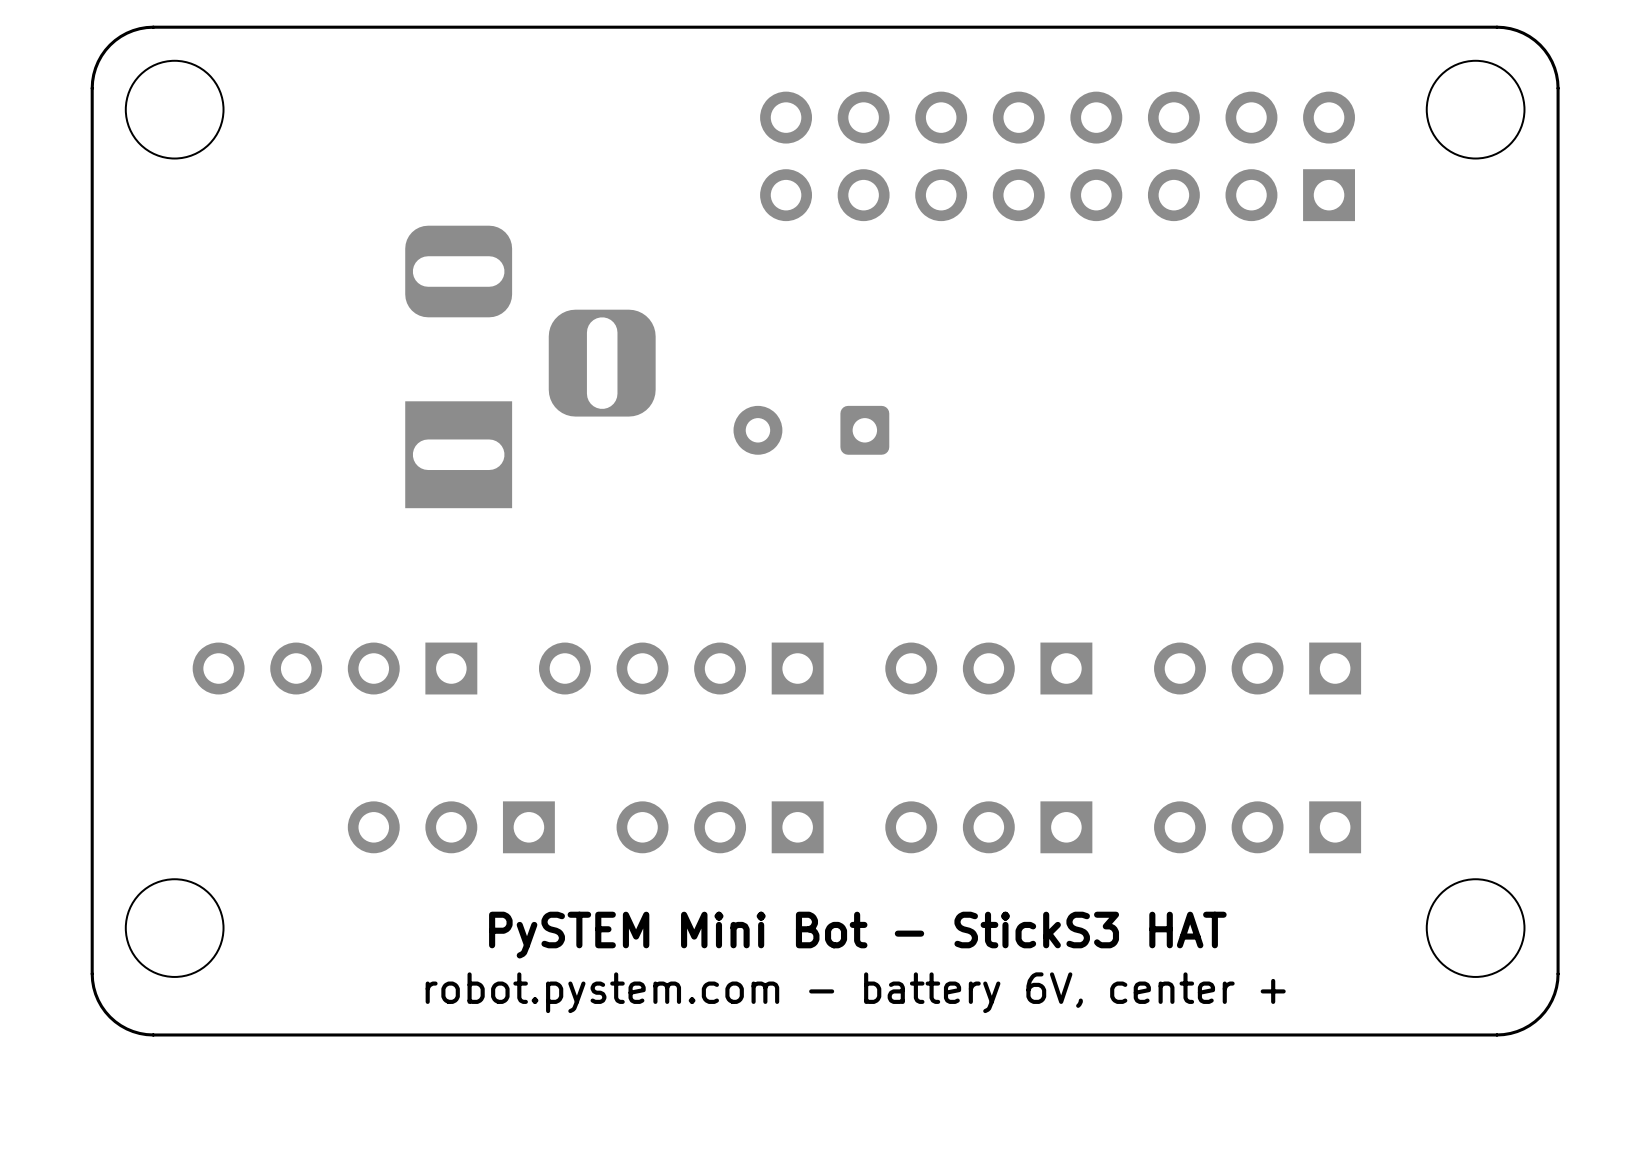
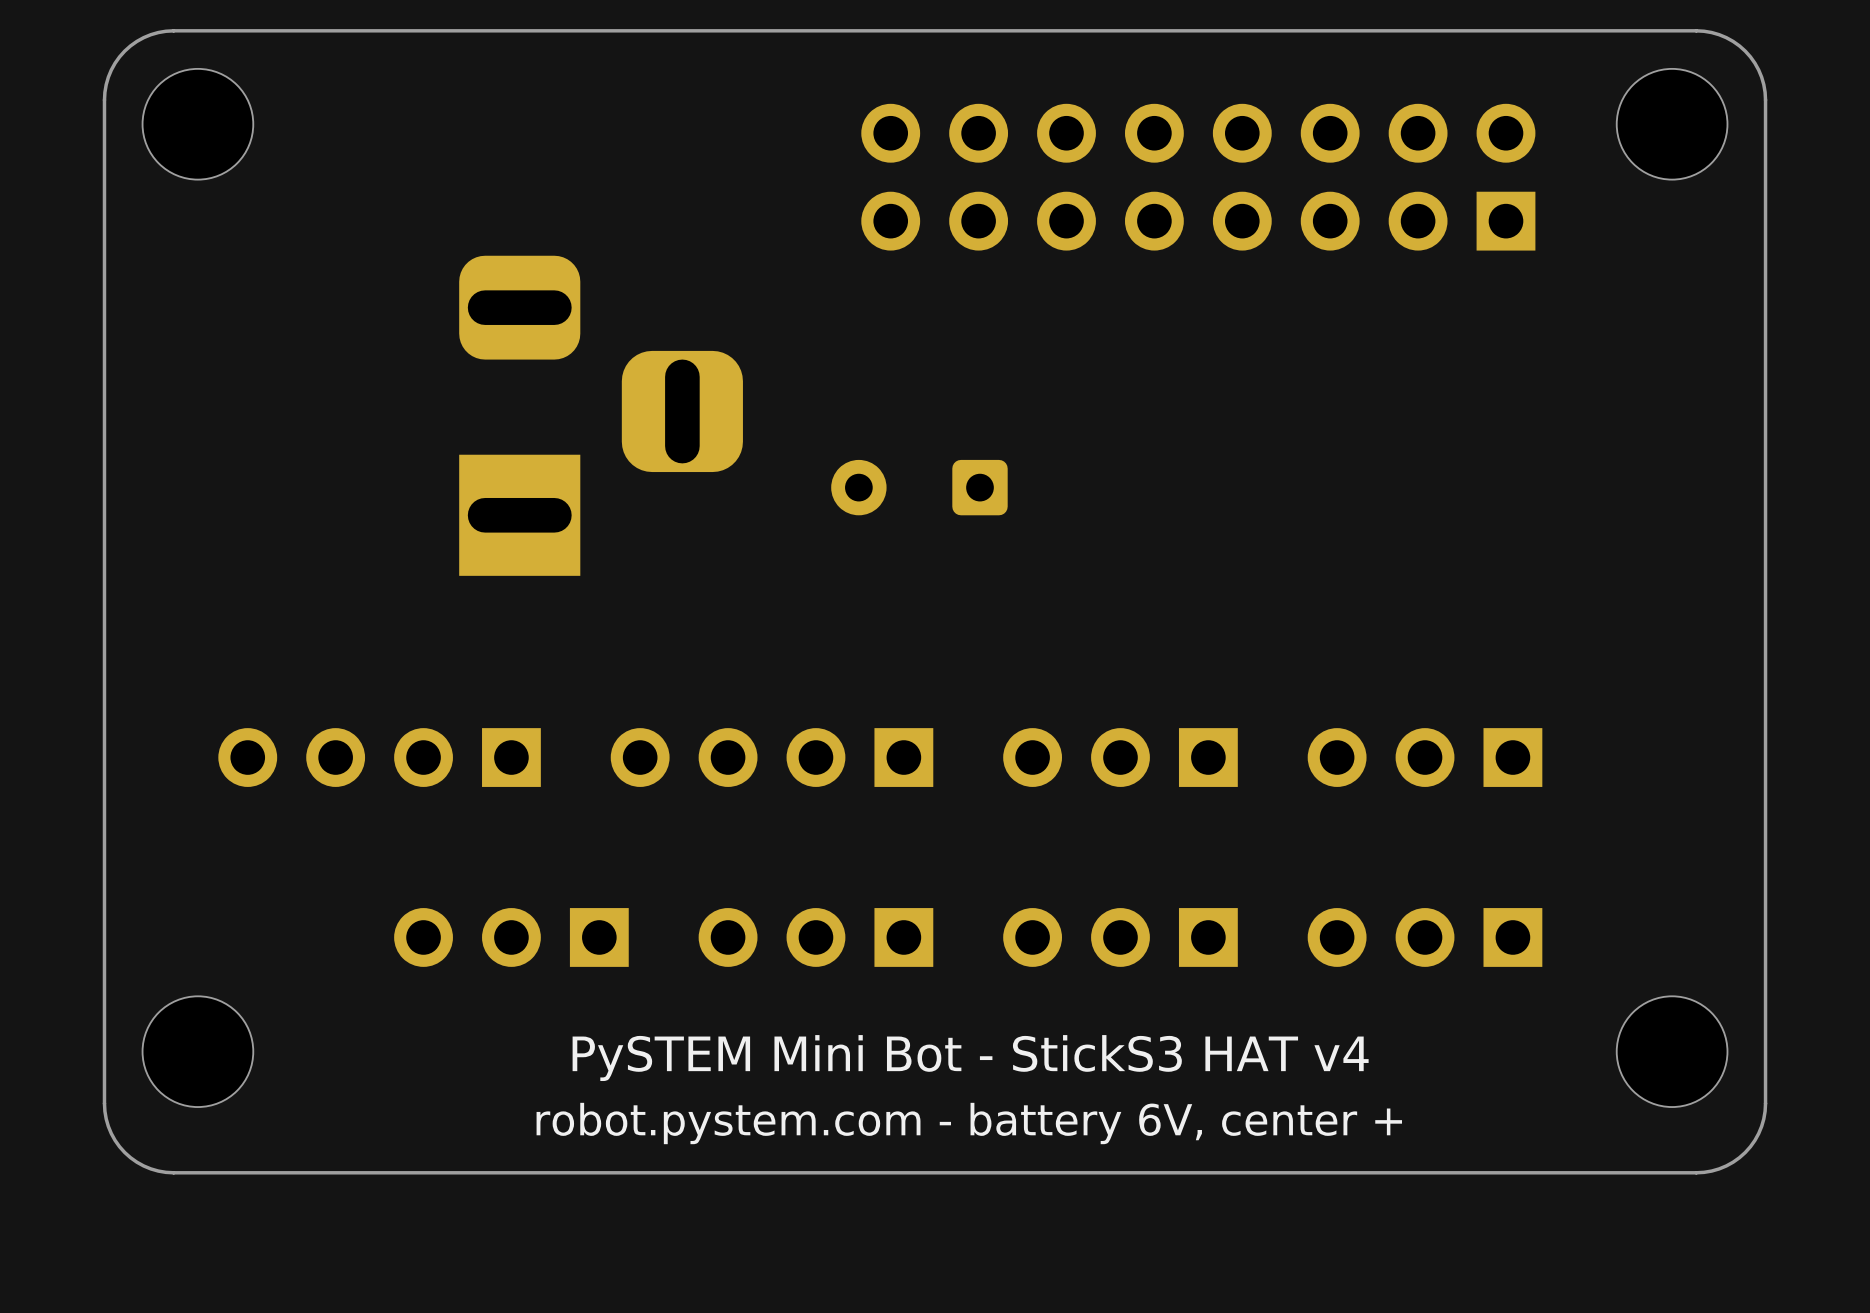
text: PySTEM Mini Bot - StickS3 HAT (857, 935) -> PySTEM Mini Bot - StickS3 HAT v4 (970, 1058)

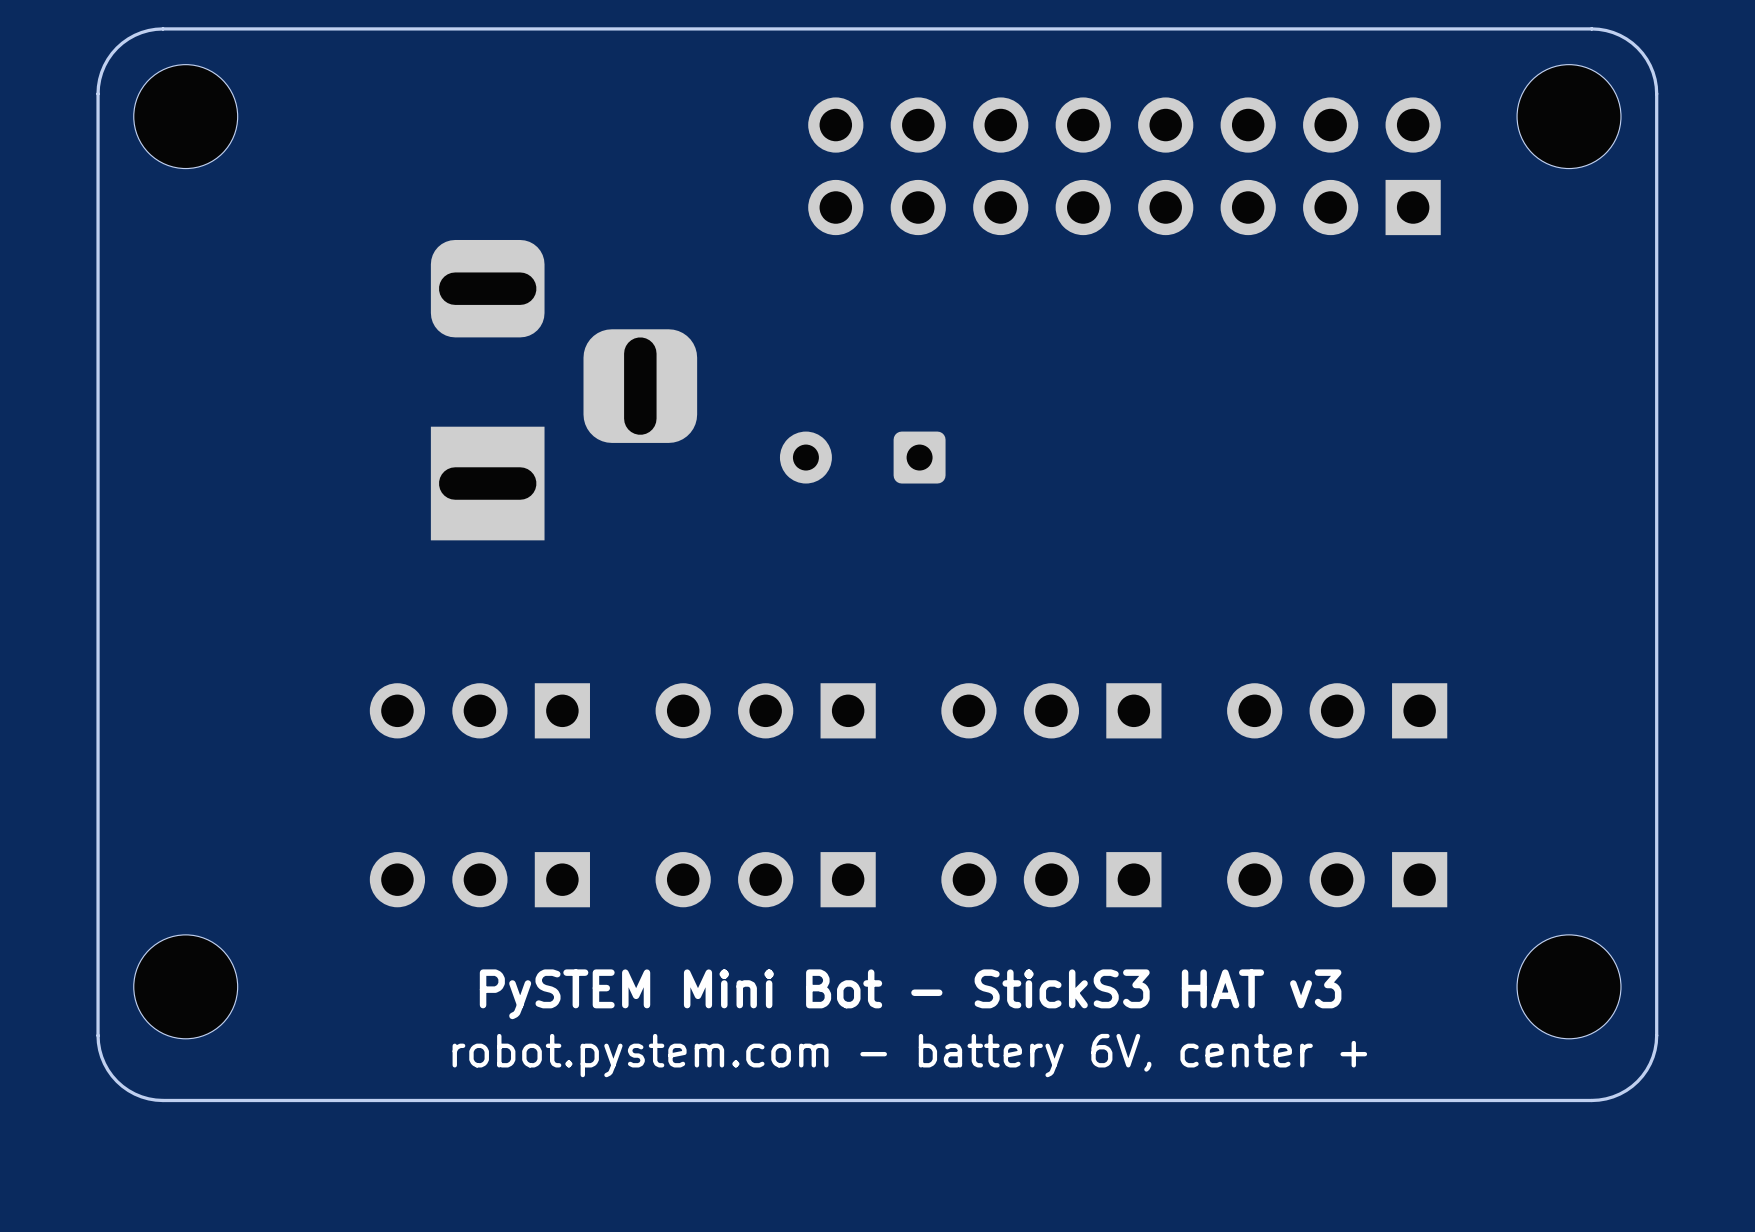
part: (379, 757) -> none
part: none -> (479, 710)
part: (772, 757) -> none
text: PySTEM Mini Bot - StickS3 HAT v4 (970, 1058) -> PySTEM Mini Bot - StickS3 HAT v3 (910, 994)

